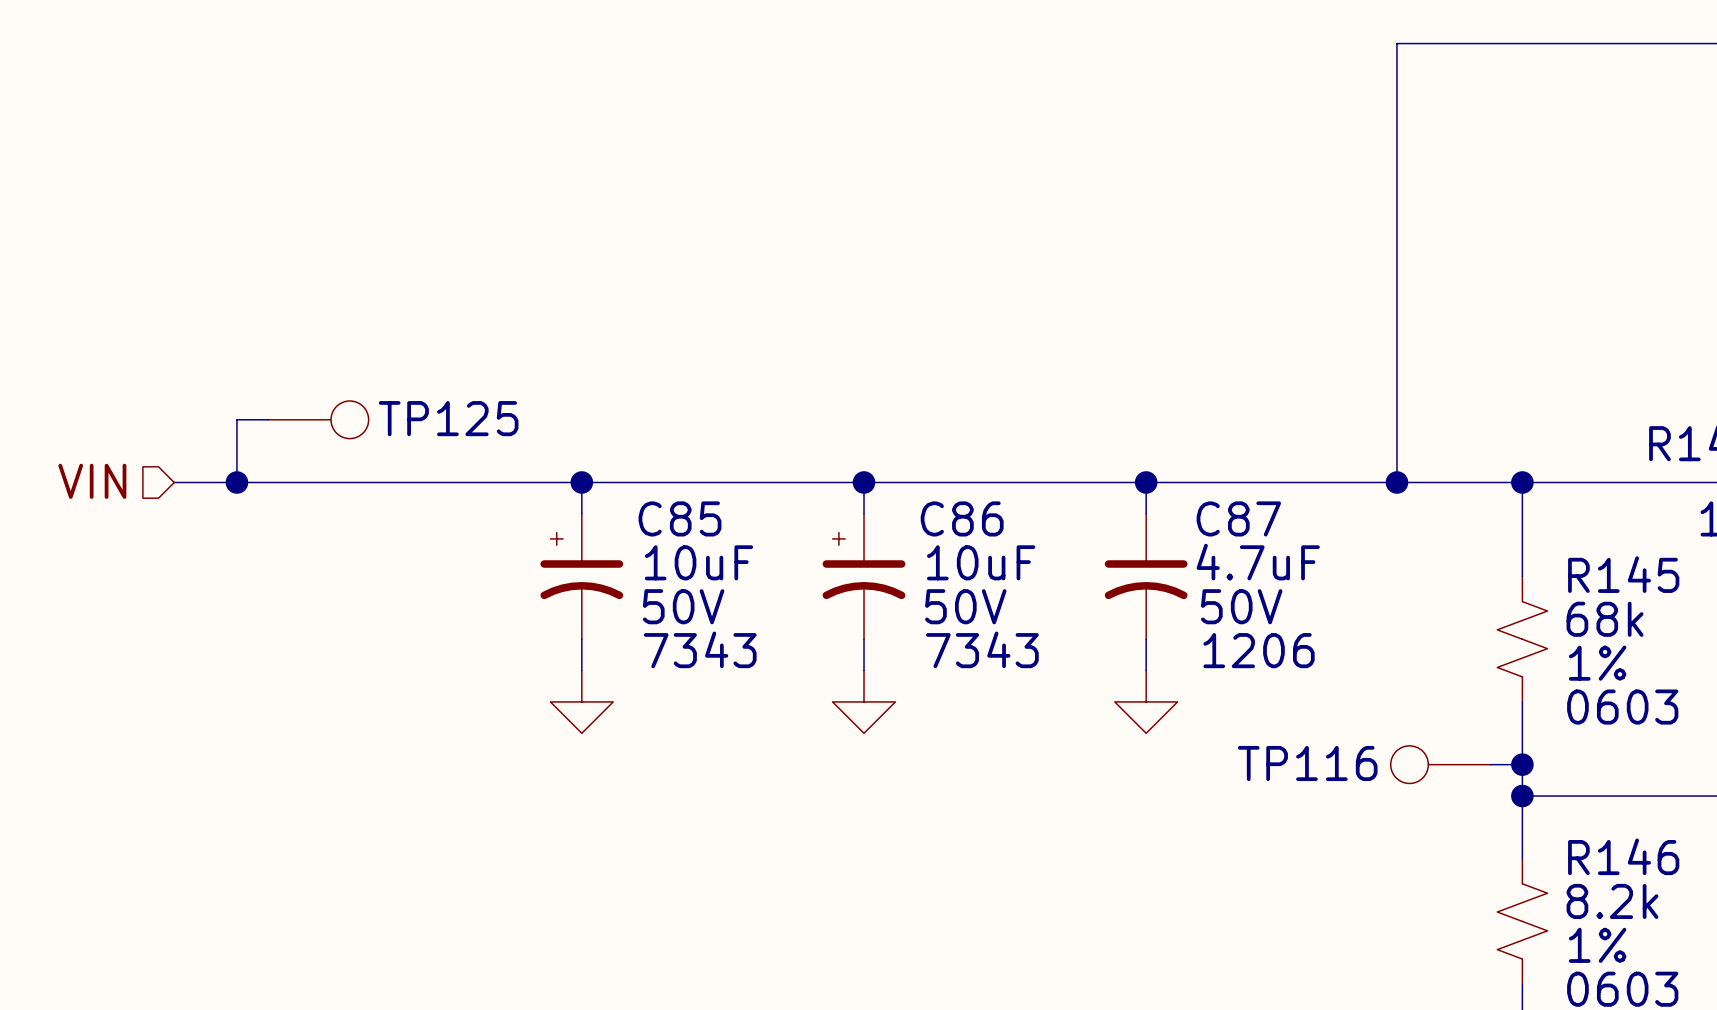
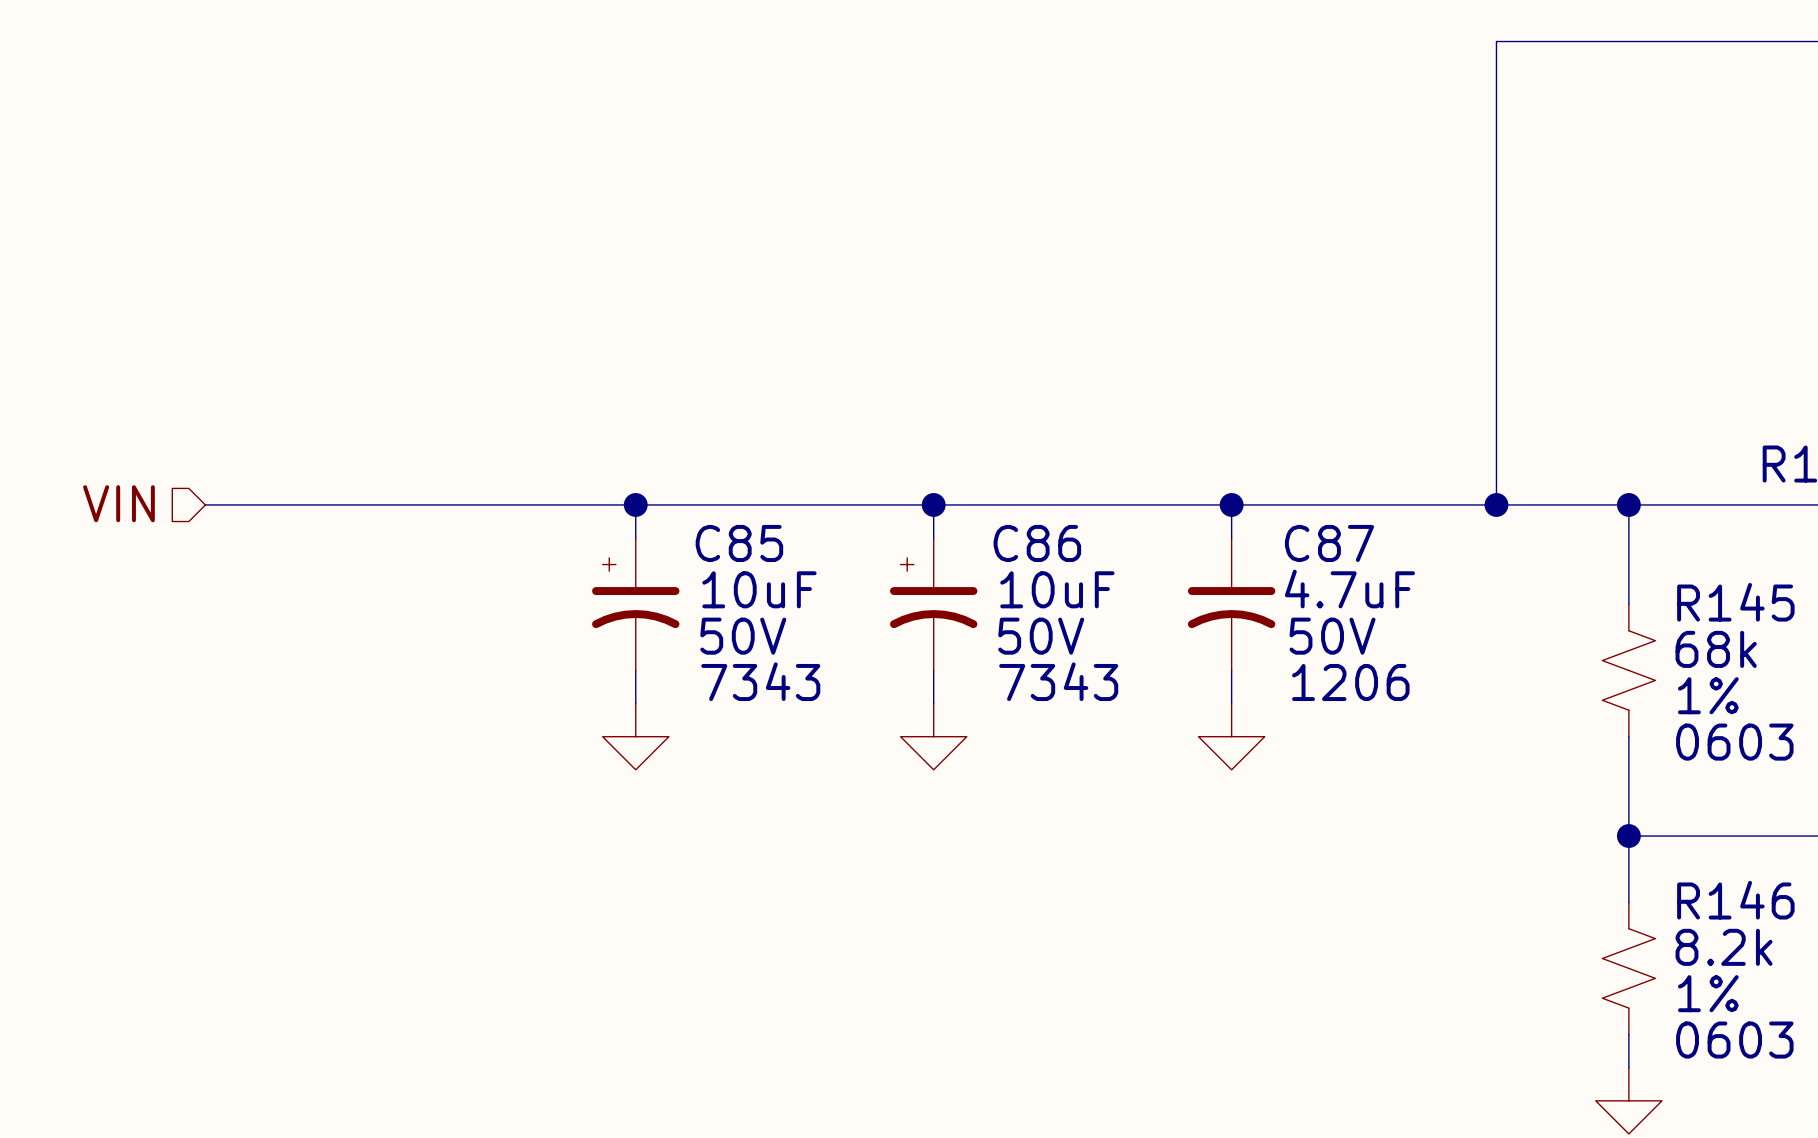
wire: (268, 419) (236, 419) (236, 482) -> none
TP125: (318, 419) -> none
junction: (236, 482) -> none
TP116: (1440, 764) -> none
wire: (1491, 764) (1522, 764) -> none
junction: (1522, 764) -> none

